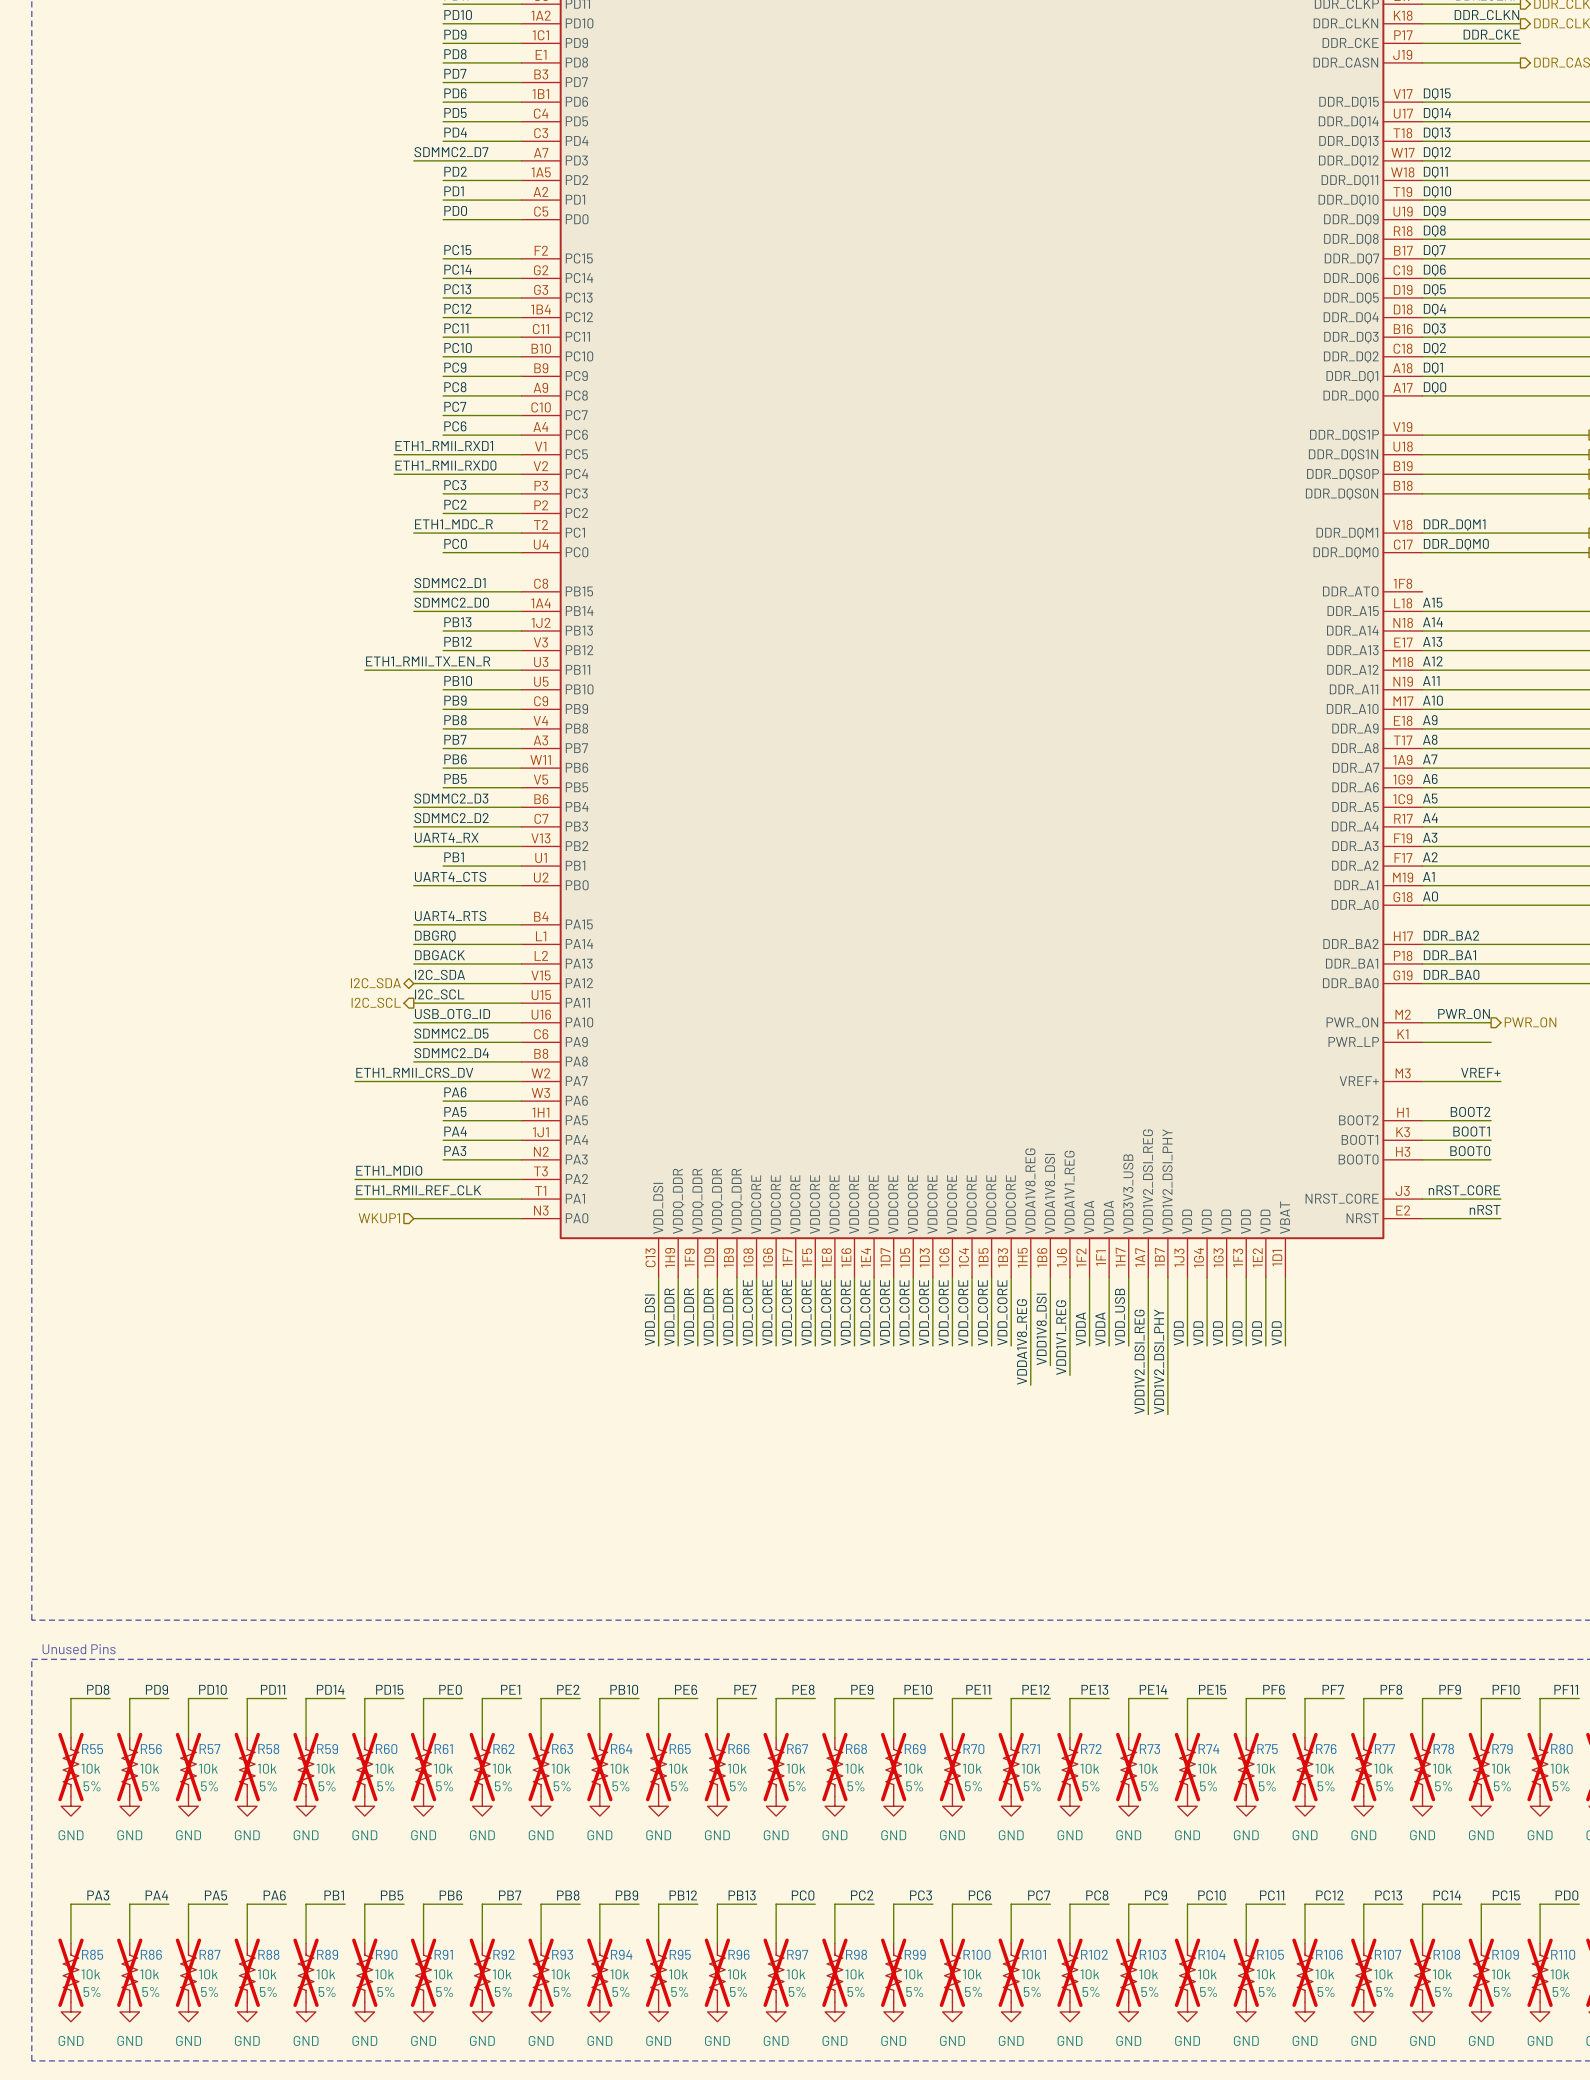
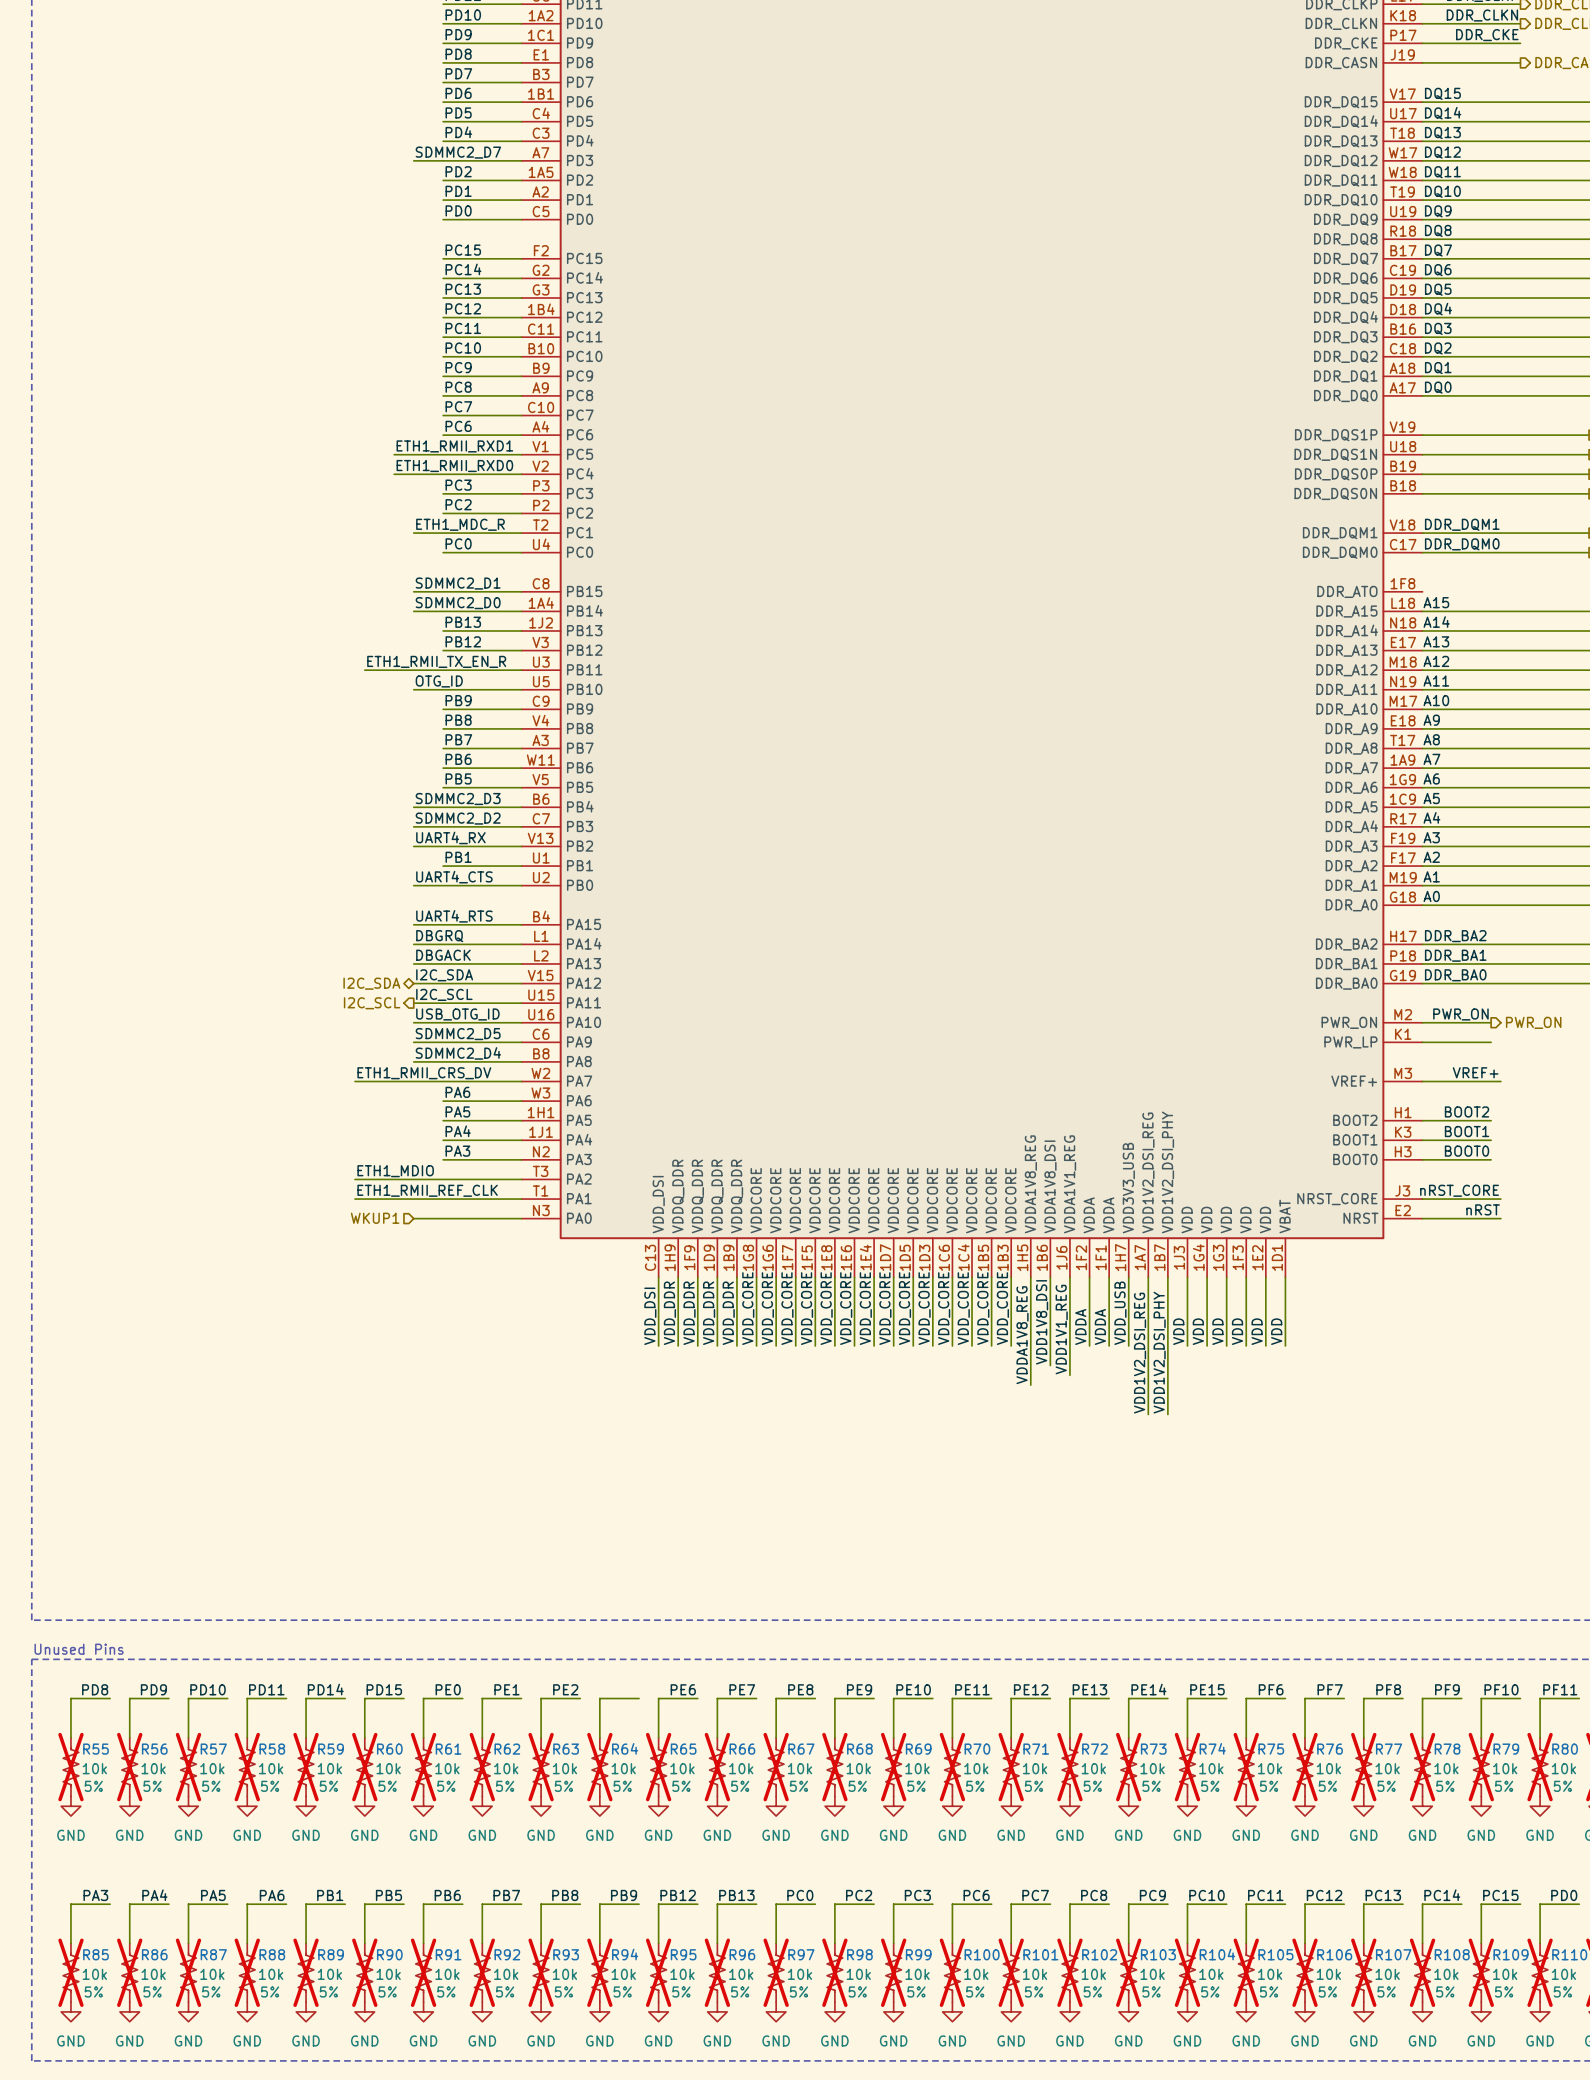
label: none -> OTG_ID (439, 681)
label: PB10 (458, 681) -> none
wire: none -> (413, 689) (443, 689)
label: PB10 (624, 1689) -> none

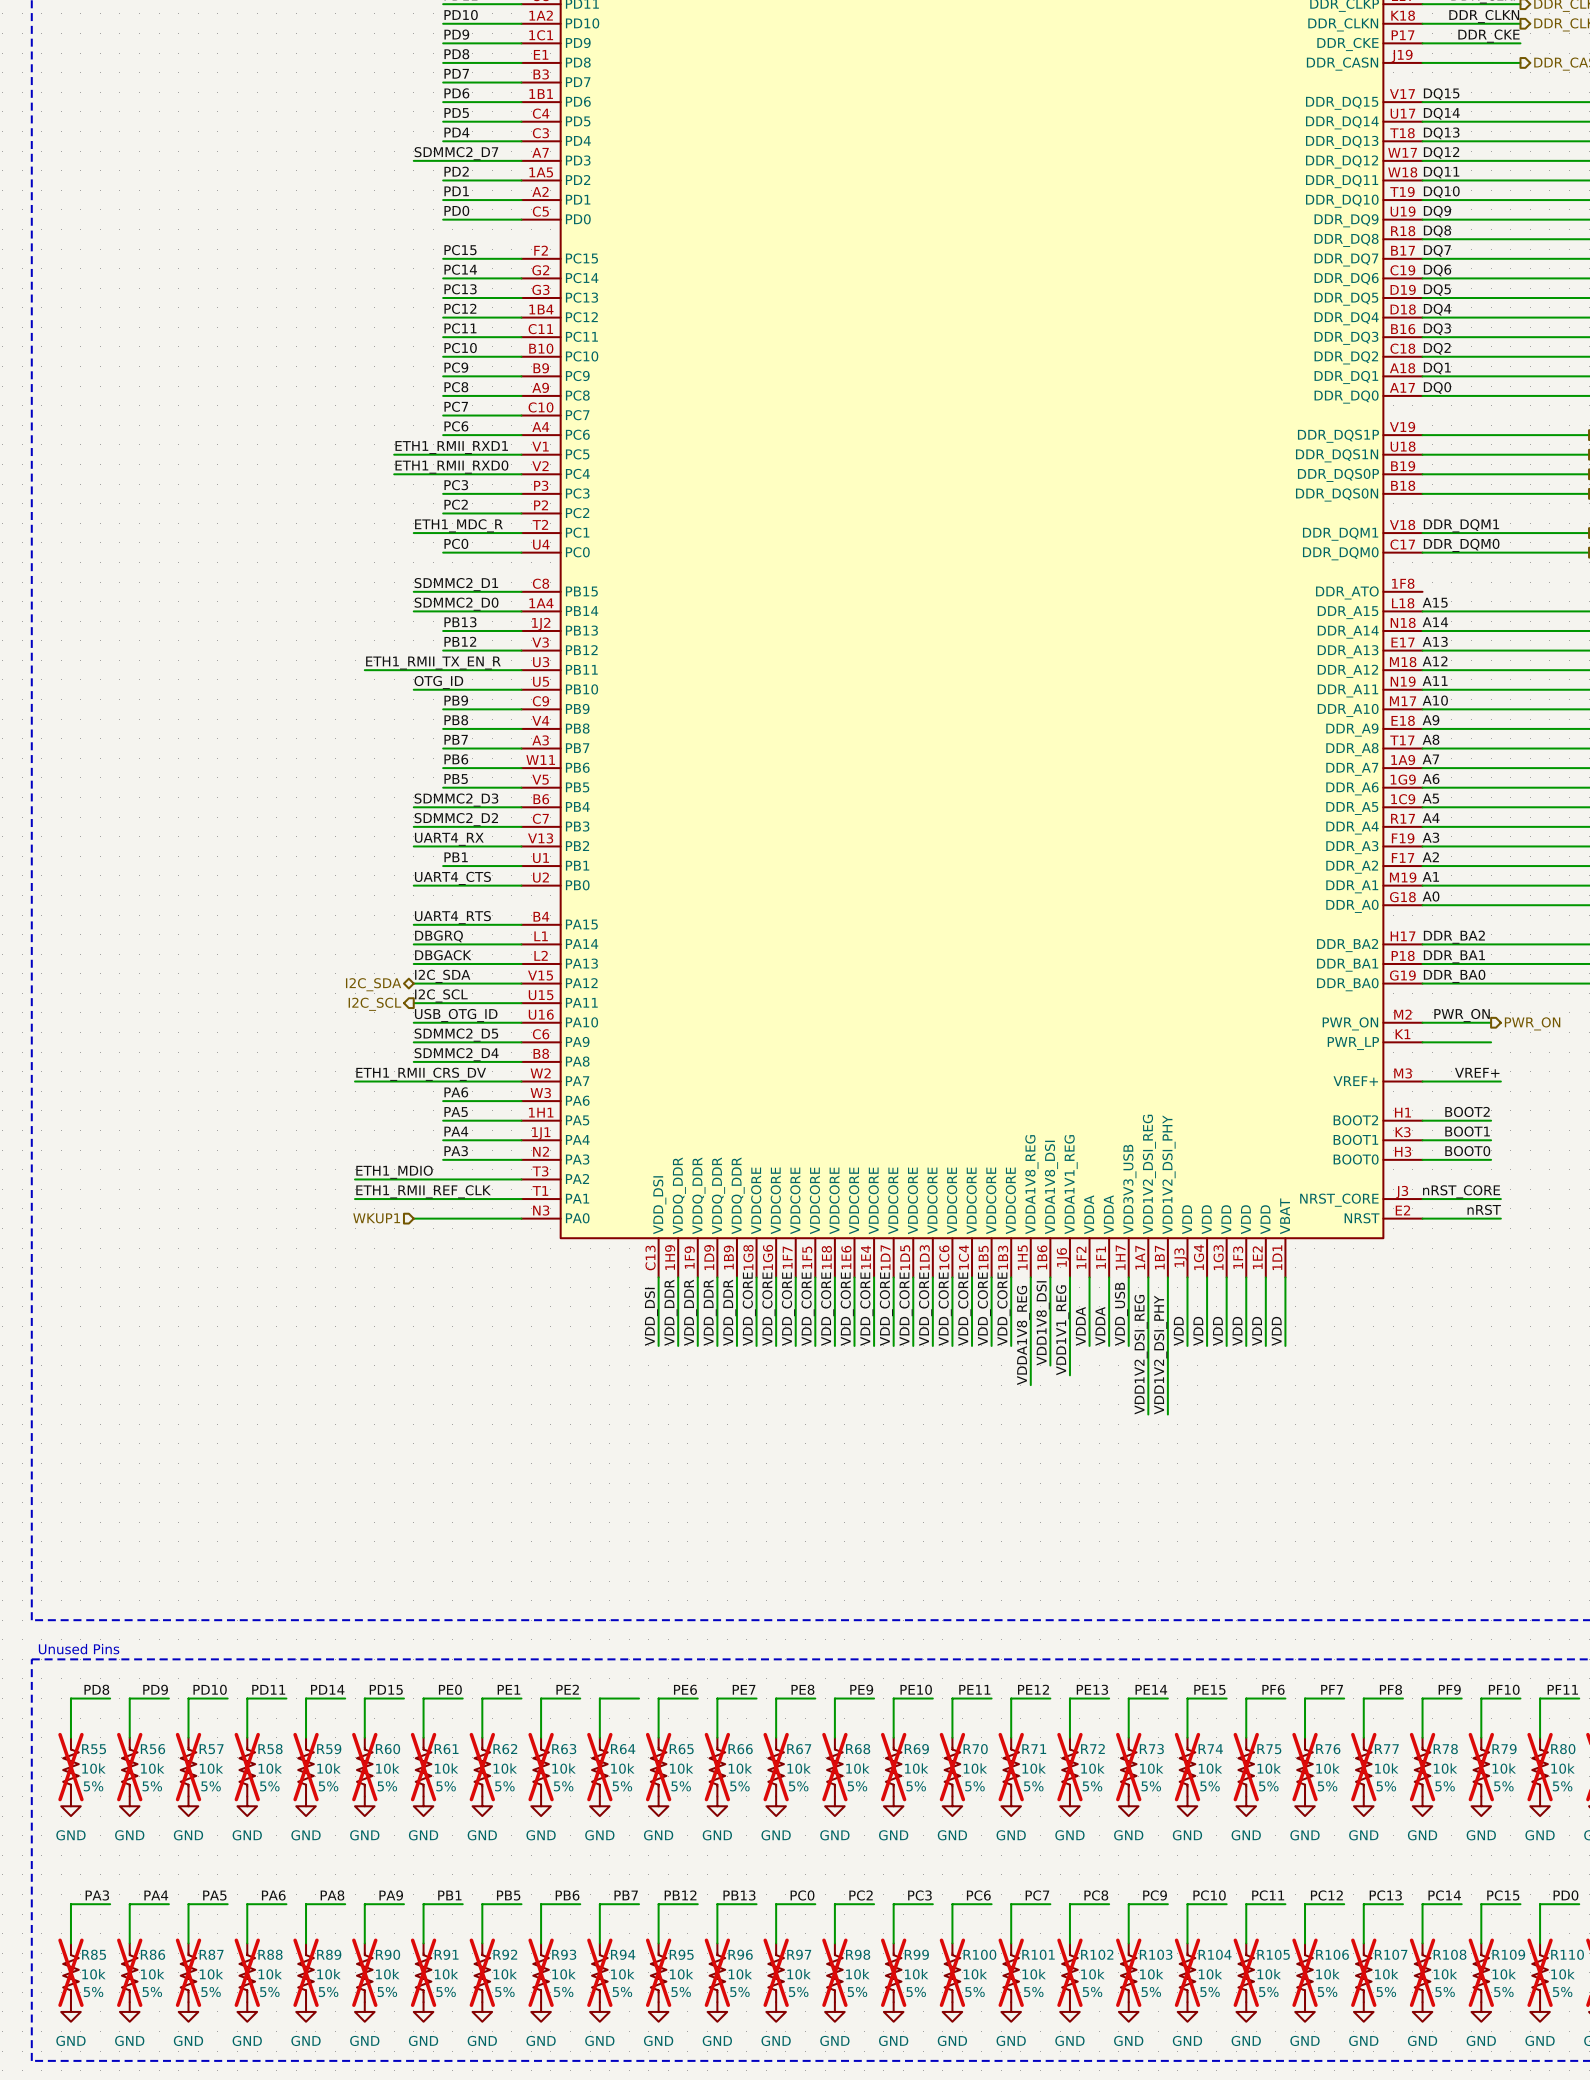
label: PB1 (330, 1895) -> PA8 (332, 1895)
label: PB5 (388, 1895) -> PA9 (391, 1895)
label: PB6 (447, 1895) -> PB1 (449, 1895)
label: PB7 (506, 1895) -> PB5 (508, 1895)
label: PB8 (565, 1895) -> PB6 (567, 1895)
label: PB9 (624, 1895) -> PB7 (626, 1895)

